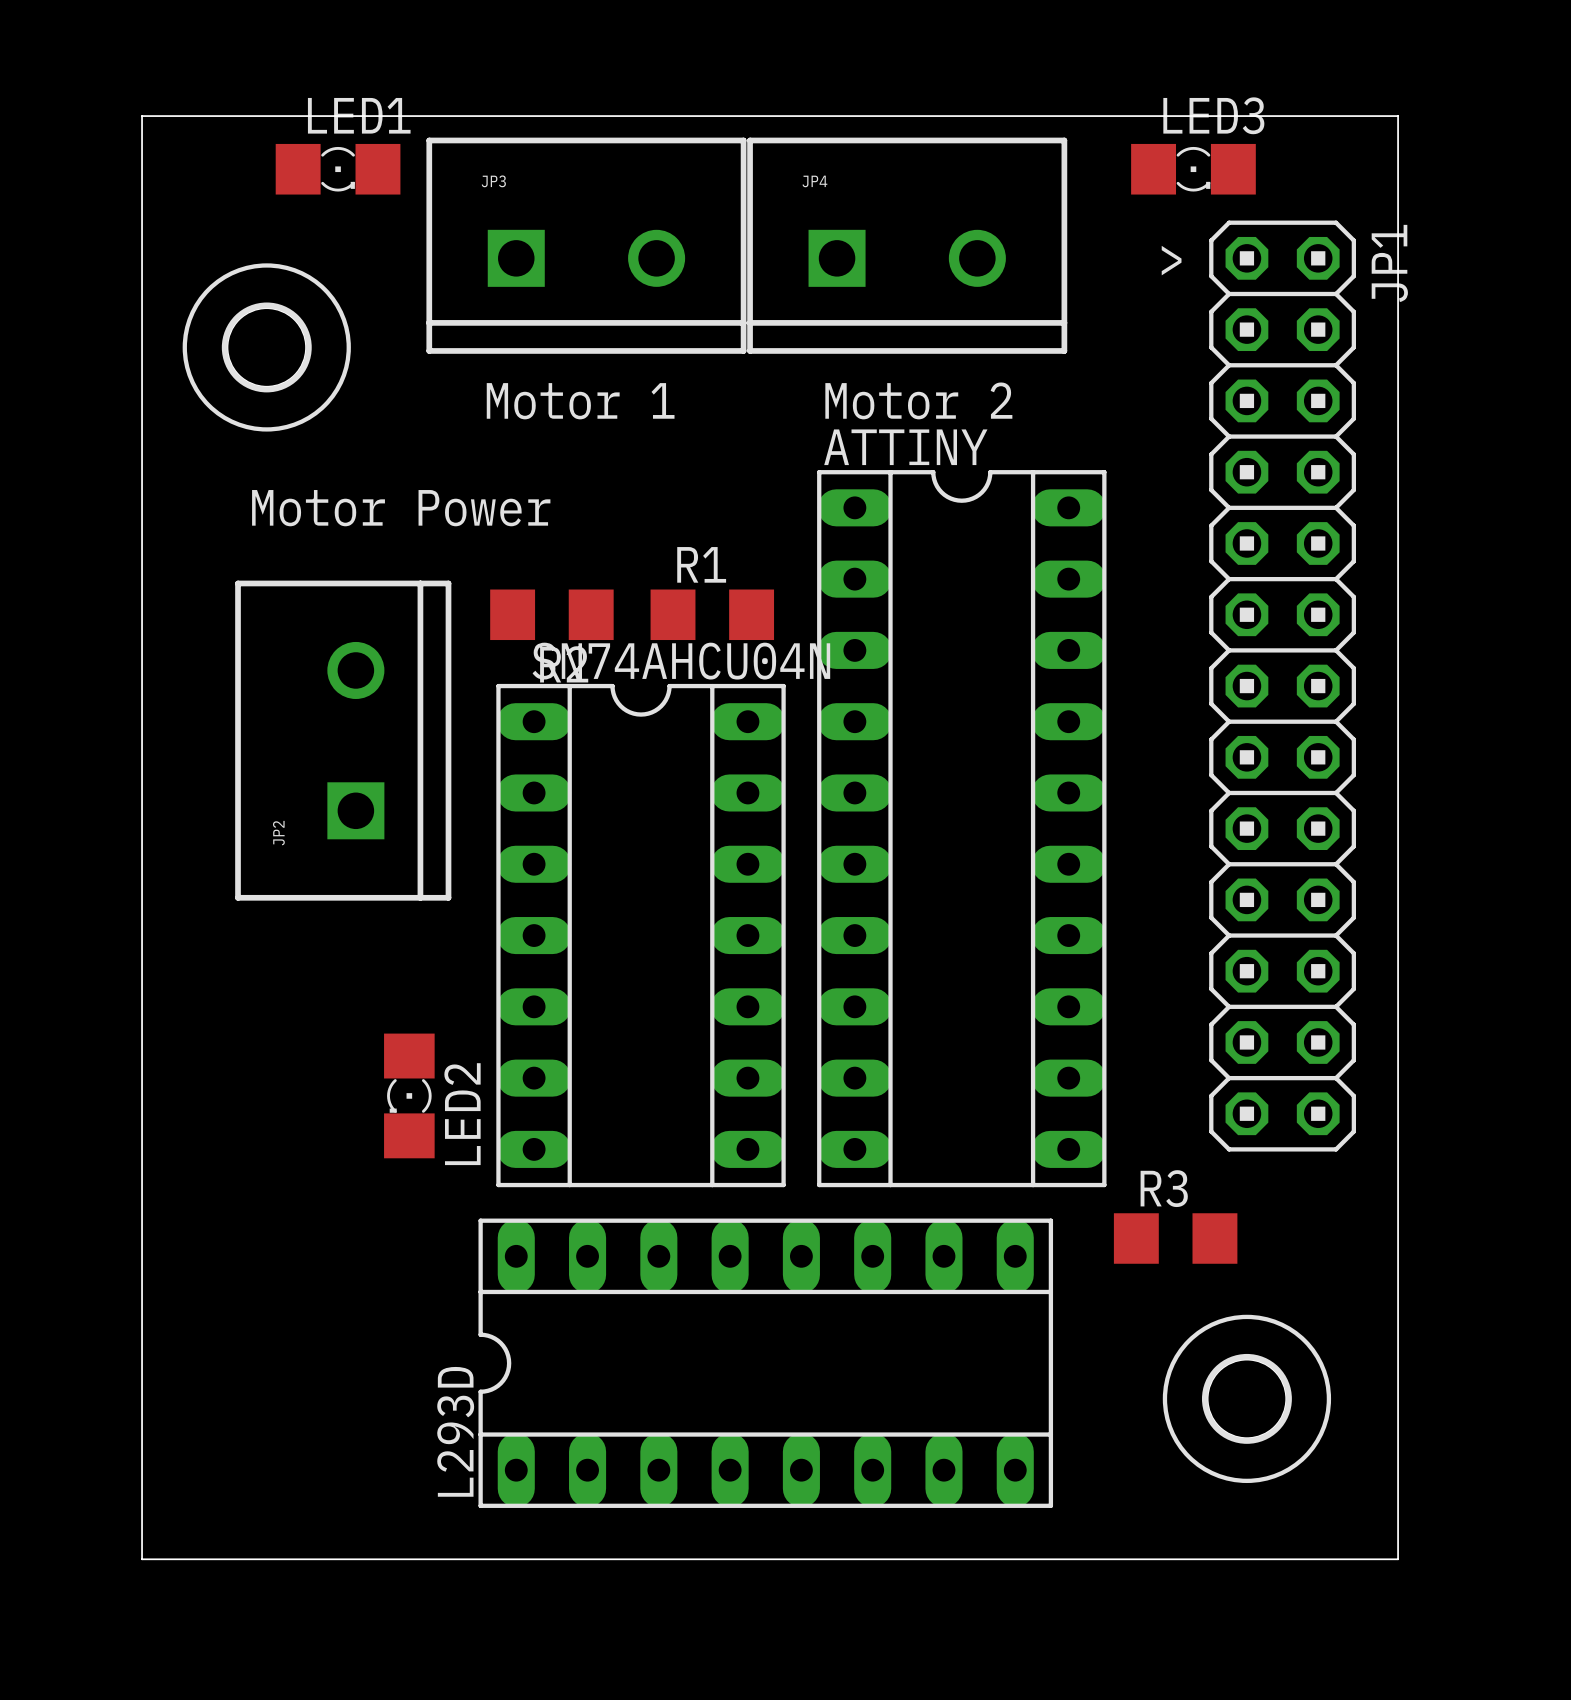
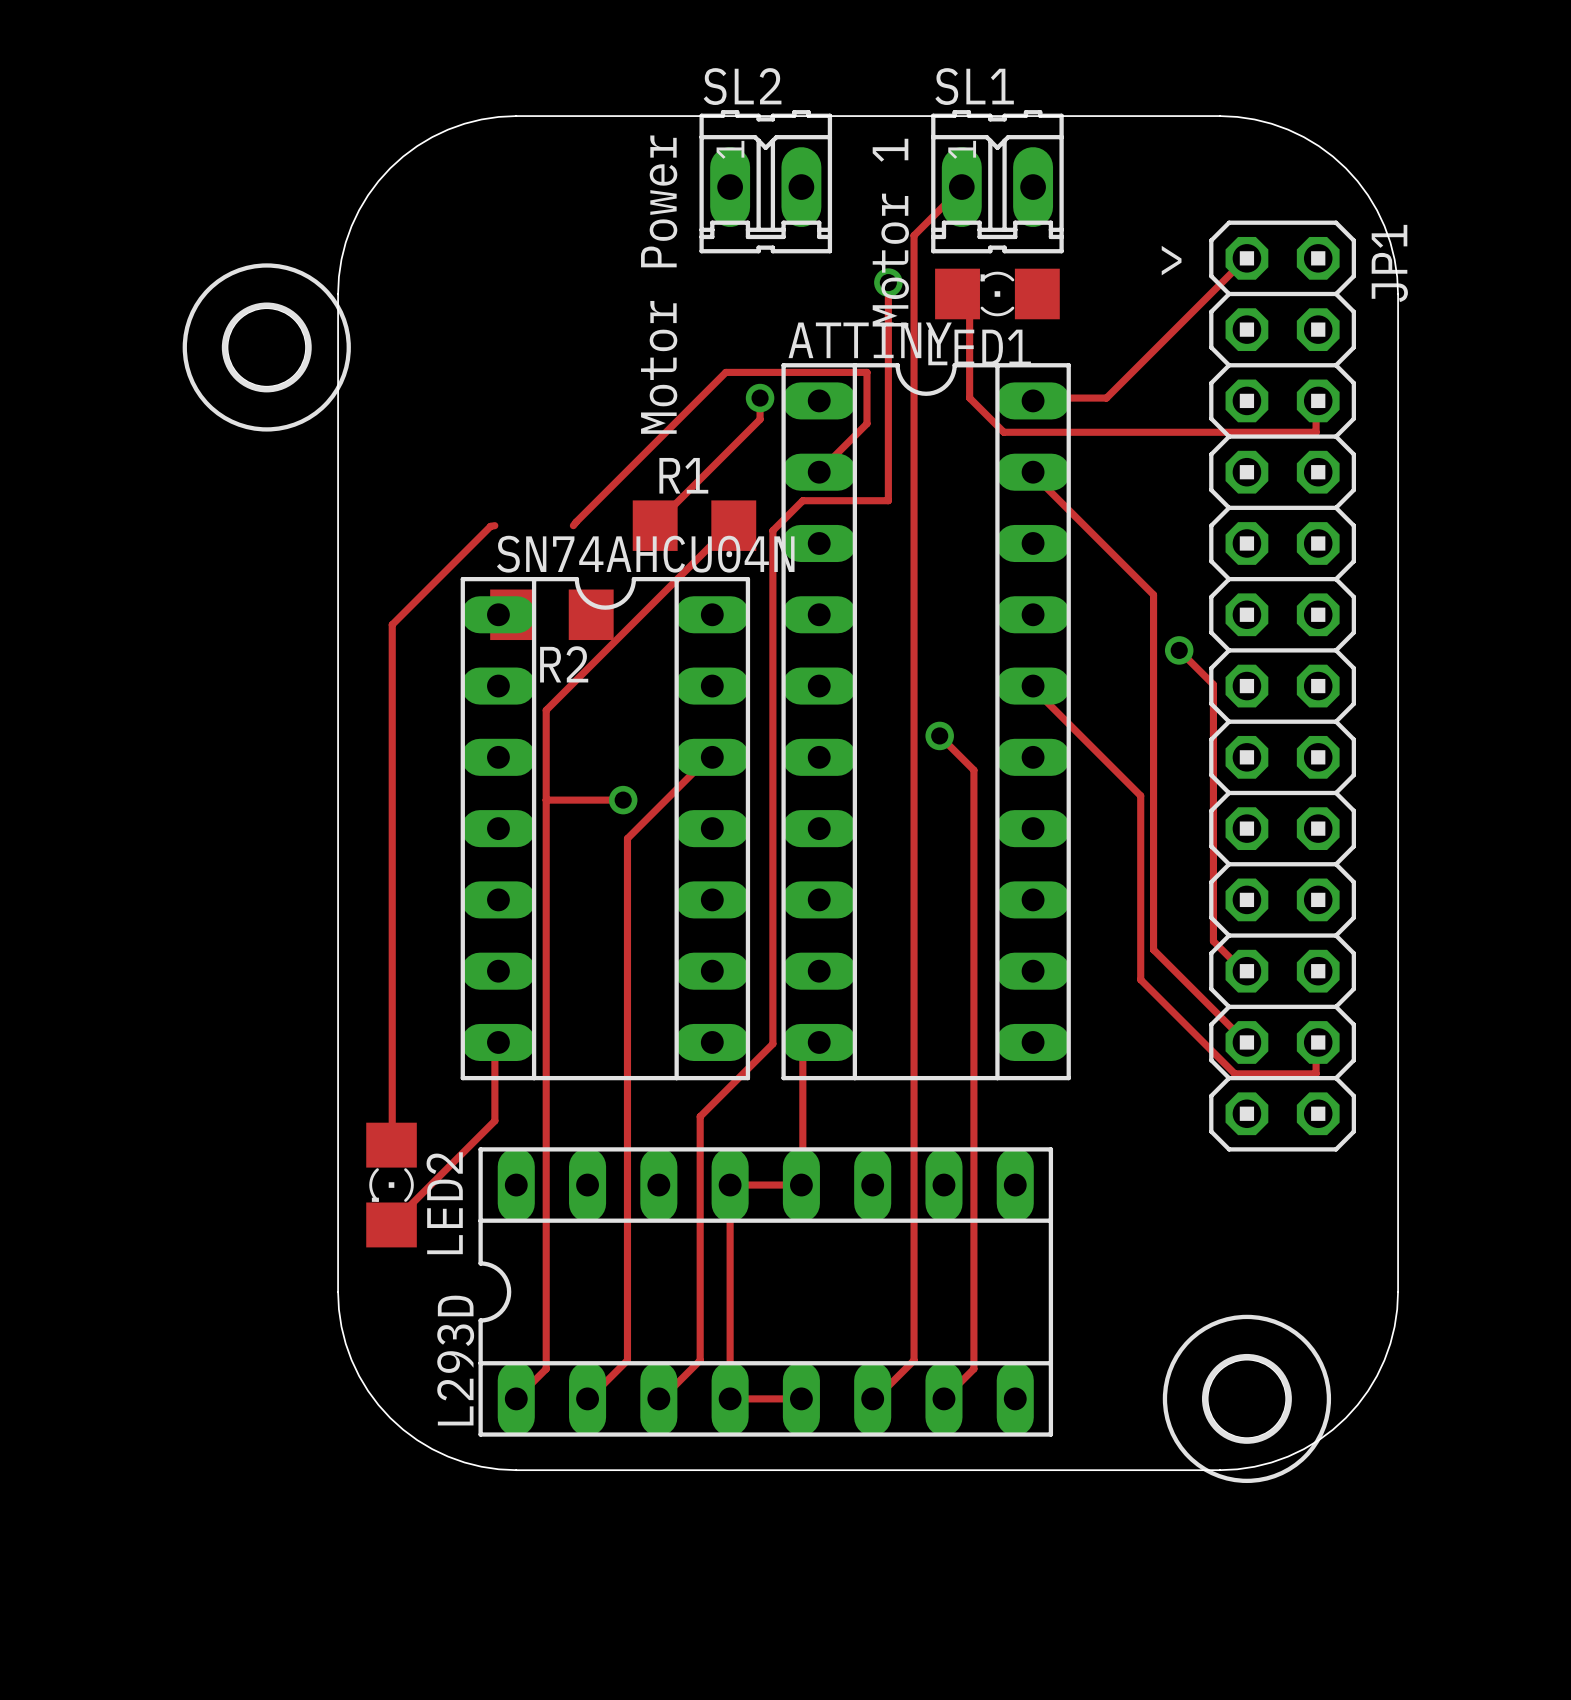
board edge: (516, 116) (142, 116) (142, 1559) (1398, 1559) (1398, 1291) -> (516, 116) (481, 119) (464, 123) (432, 137) (403, 156) (378, 181) (359, 210) (345, 242) (338, 276) (338, 1291) (341, 1326) (345, 1343) (359, 1375) (378, 1405) (403, 1429) (432, 1449) (464, 1462) (498, 1469) (1237, 1469) (1271, 1462) (1303, 1449) (1332, 1429) (1357, 1405) (1377, 1375) (1390, 1343) (1394, 1326) (1398, 1291)
board edge: (1219, 116) (1398, 116) (1398, 294) -> (1219, 116) (1254, 119) (1288, 129) (1318, 146) (1345, 168) (1368, 195) (1384, 226) (1394, 259) (1398, 294)
LED1 rotation: 0° (338, 169) -> 180° (997, 293)
LED1 position: (338, 169) -> (997, 293)
LED3: (1193, 169) -> none
SL2: none -> (765, 181)
SL1: none -> (997, 181)
track: none -> (961, 187) (914, 235) (914, 1360) (875, 1398) (872, 1398)
JP3: (586, 245) -> none
JP4: (907, 245) -> none
track: none -> (1246, 258) (1106, 398) (1033, 398) (1033, 400)
track: none -> (888, 282) (888, 500) (802, 500) (772, 530) (772, 1043) (700, 1116) (700, 1360) (661, 1398) (658, 1398)
via: none -> (888, 282)
track: none -> (957, 293) (969, 303) (969, 398) (1003, 432) (1316, 432) (1316, 402) (1318, 400)
track: none -> (760, 398) (760, 419) (655, 525)
via: none -> (760, 398)
text: Motor 2 (918, 400) -> none
text rotation: 0° (580, 401) -> 90° counterclockwise (890, 232)
text position: Motor 1 (580, 401) -> Motor 1 (890, 232)
track: none -> (819, 472) (866, 423) (866, 372) (725, 372) (573, 525)
track: none -> (1033, 472) (1153, 594) (1153, 949) (1246, 1042)
text rotation: 0° (401, 508) -> 90° counterclockwise (659, 284)
track: none -> (494, 525) (490, 526) (392, 624) (391, 1145)
track: none -> (733, 525) (730, 526) (546, 710) (546, 1368) (516, 1398)
R1 position: (712, 614) -> (694, 525)
track: none -> (1179, 650) (1213, 684) (1213, 941) (1243, 971) (1246, 971)
via: none -> (1179, 650)
track: none -> (1033, 686) (1140, 795) (1140, 979) (1234, 1073) (1316, 1073) (1316, 1043) (1318, 1042)
track: none -> (939, 735) (973, 770) (973, 1368) (943, 1398)
via: none -> (939, 735)
JP2: (343, 740) -> none
track: none -> (712, 757) (708, 757) (627, 838) (627, 1360) (587, 1398)
track: none -> (546, 800) (623, 800)
via: none -> (623, 800)
ATTINY position: (961, 828) -> (926, 721)
SN74AHCU04N position: (641, 935) -> (605, 828)
track: none -> (498, 1042) (494, 1043) (494, 1120) (391, 1224)
track: none -> (819, 1042) (802, 1056) (802, 1185) (730, 1185) (730, 1398) (801, 1398)
LED2 position: (409, 1095) -> (391, 1185)
R3: (1175, 1238) -> none
L293D position: (765, 1363) -> (765, 1291)

